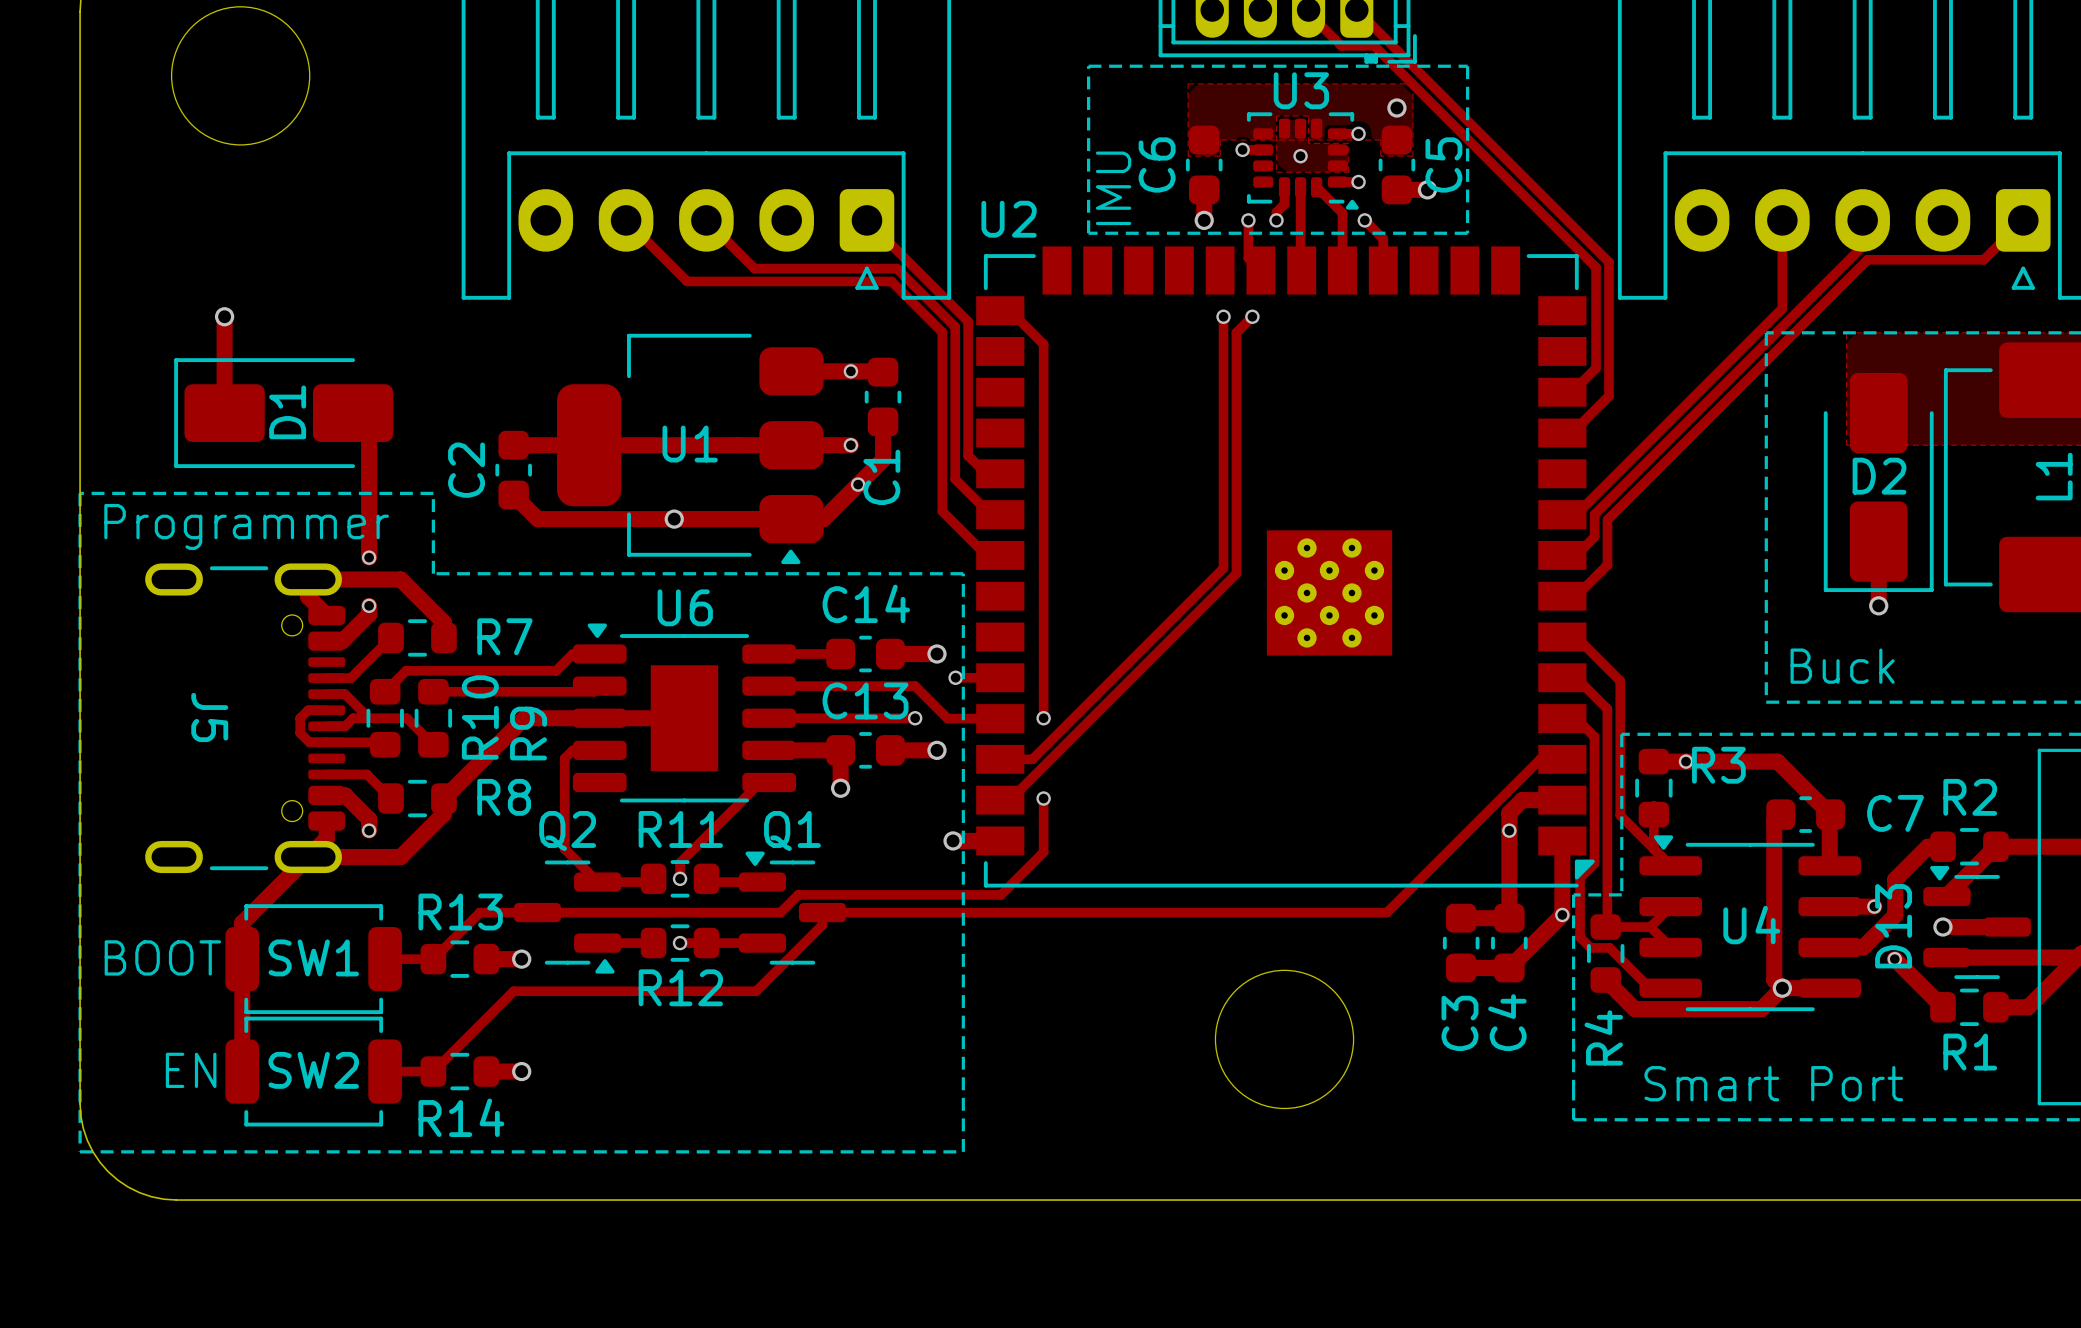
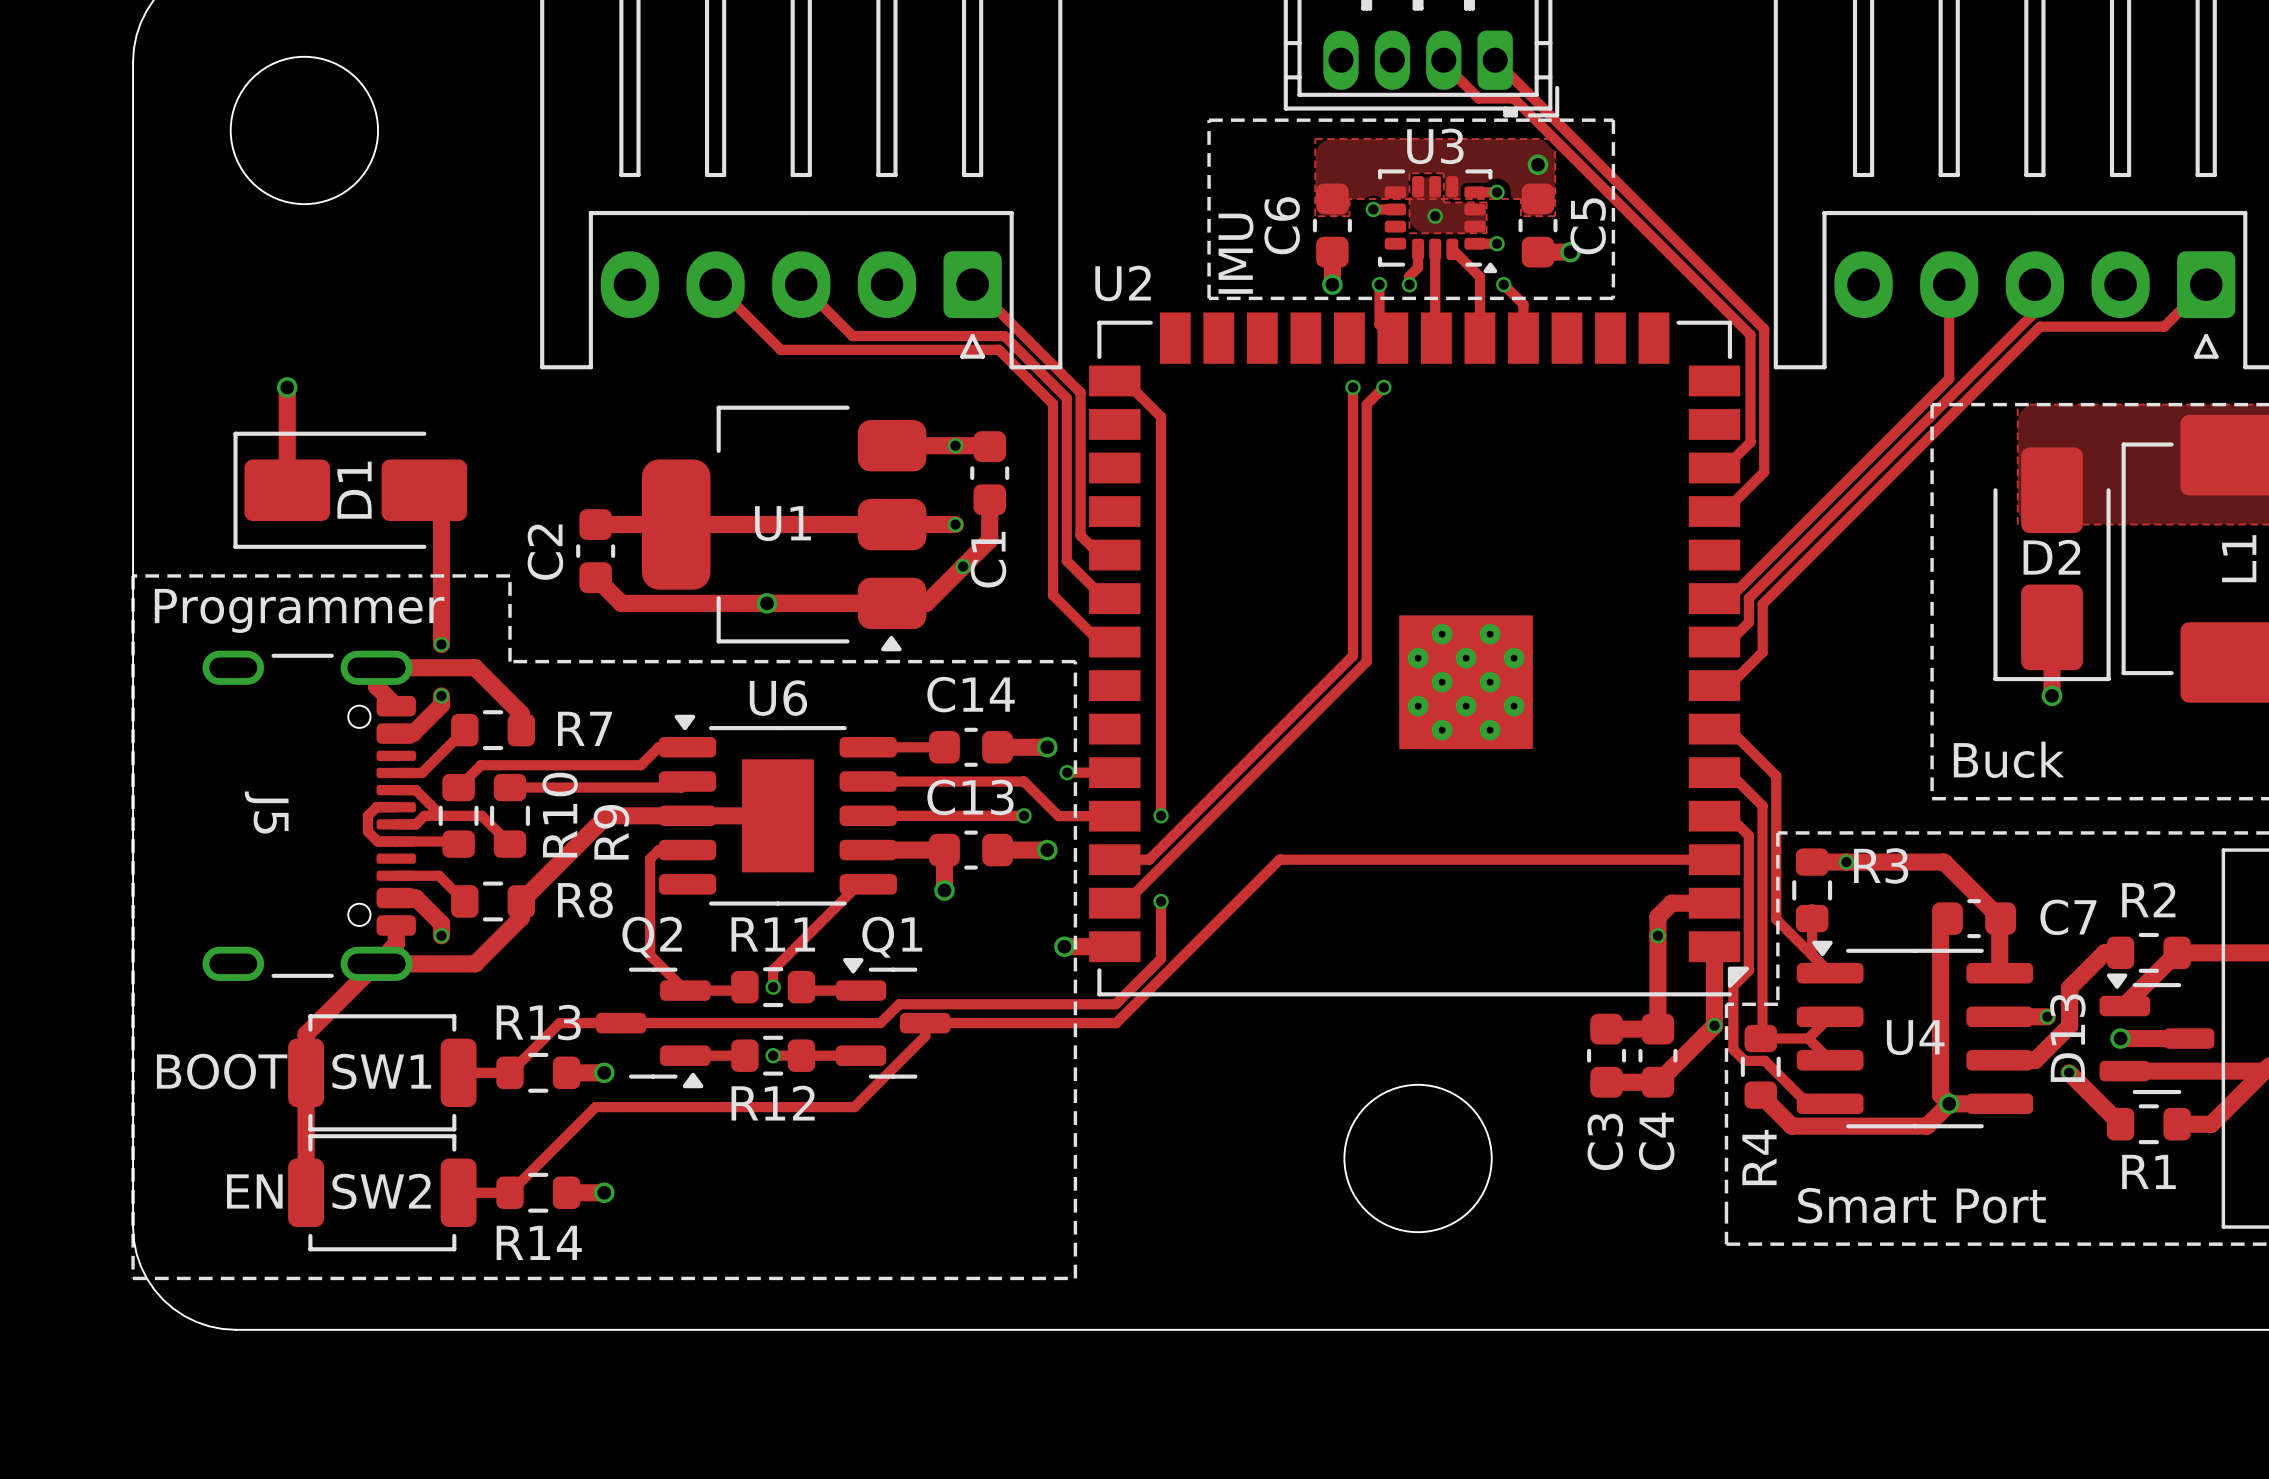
track: (1540, 759) (1387, 912) (1001, 912) -> (1690, 859) (1279, 859) (1116, 1023)

